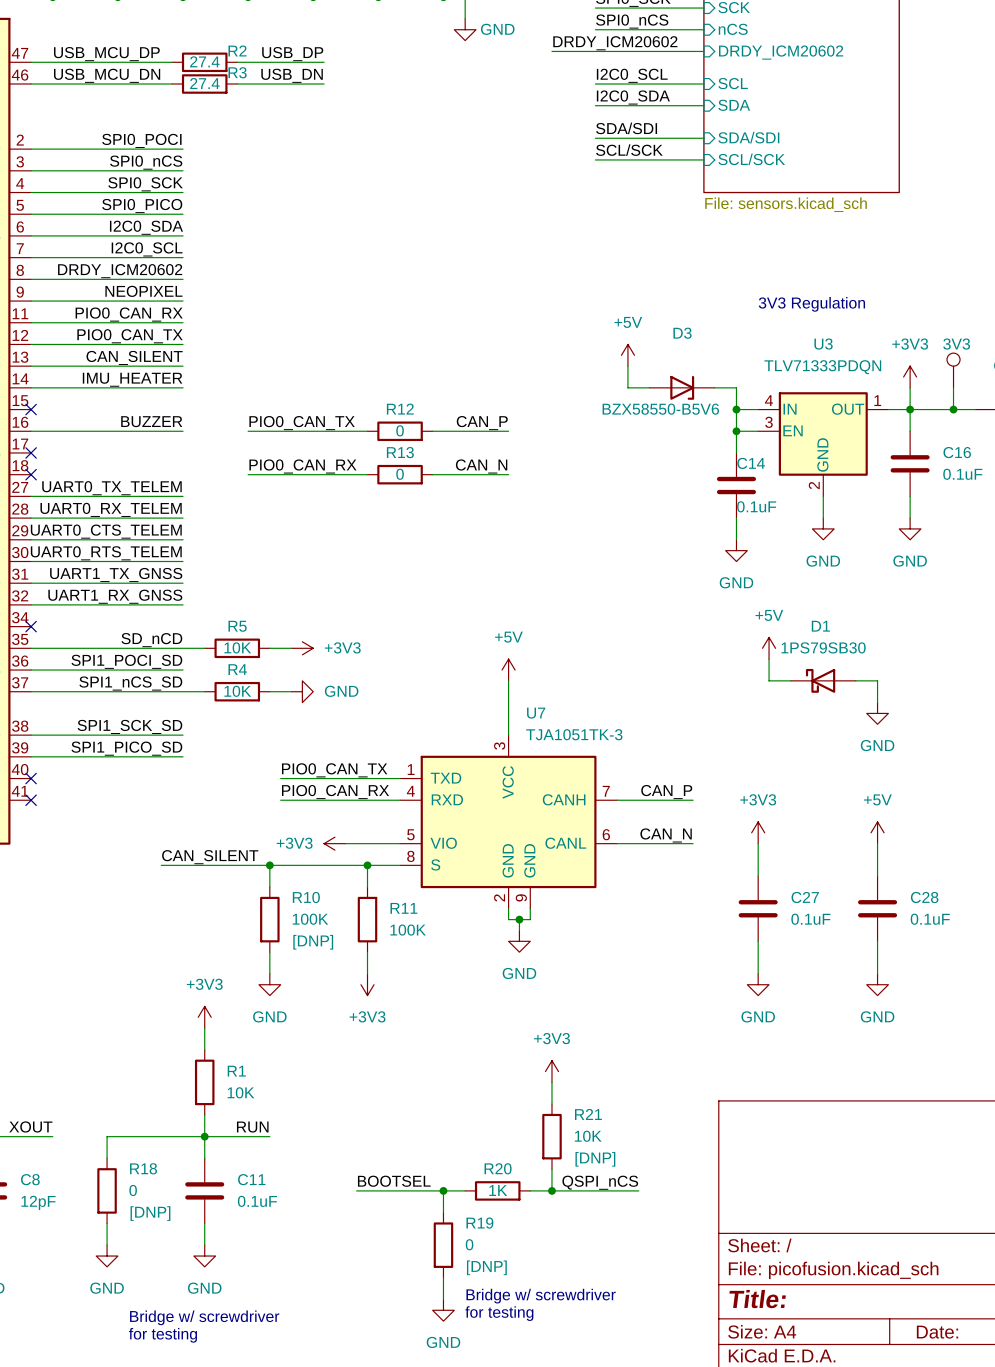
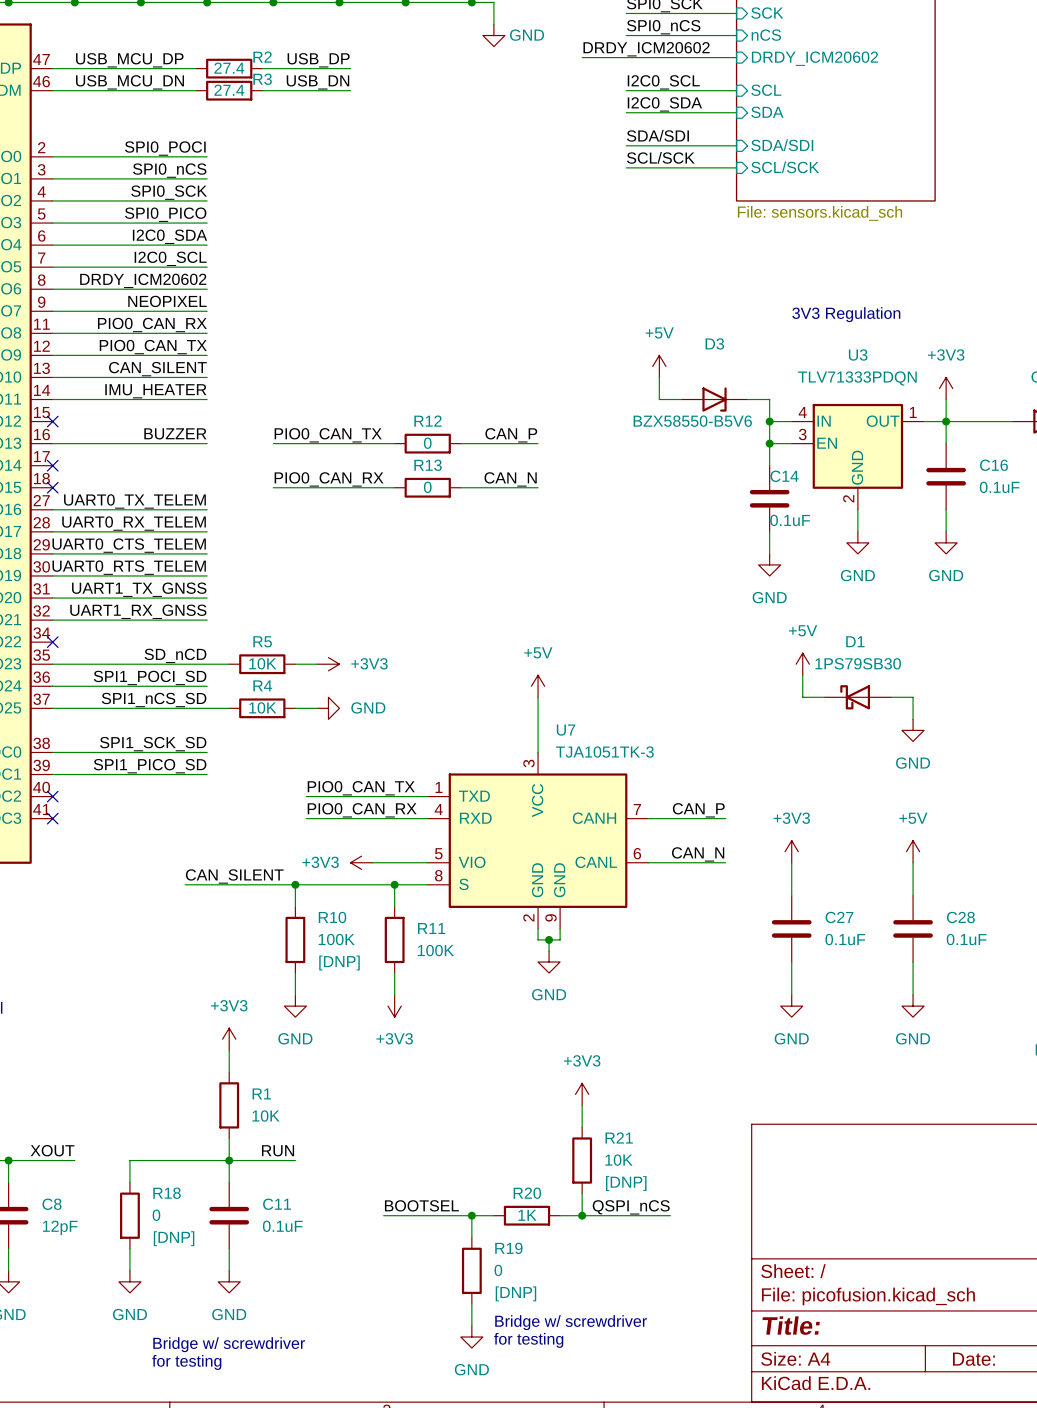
3V3: (953, 370) -> none
wire: (953, 387) (953, 409) -> none
junction: (953, 409) -> none

